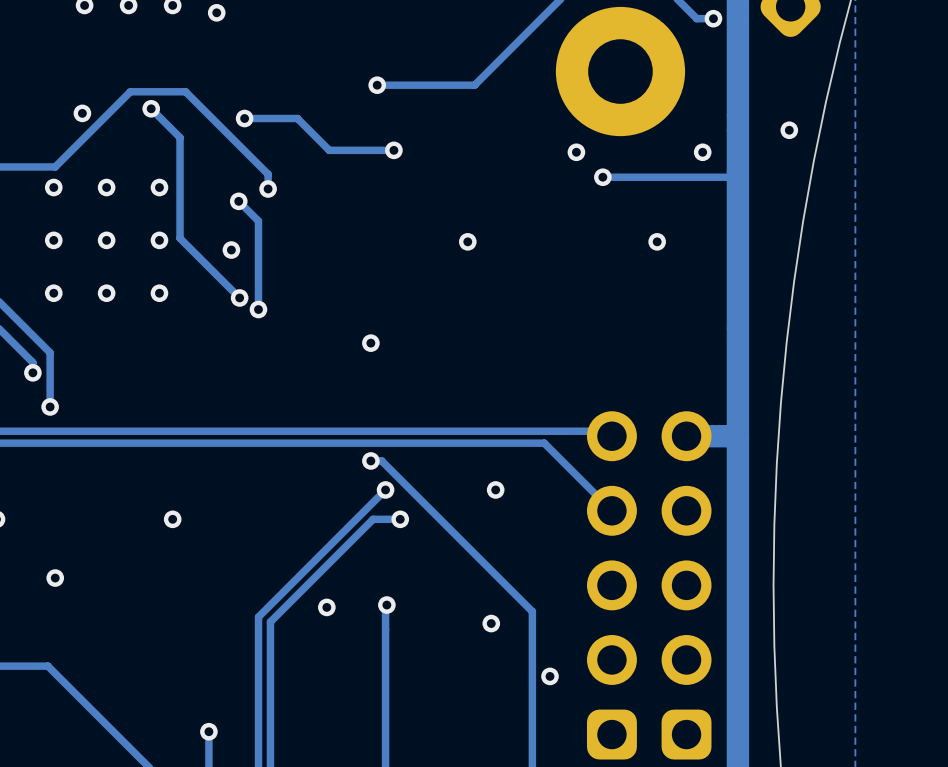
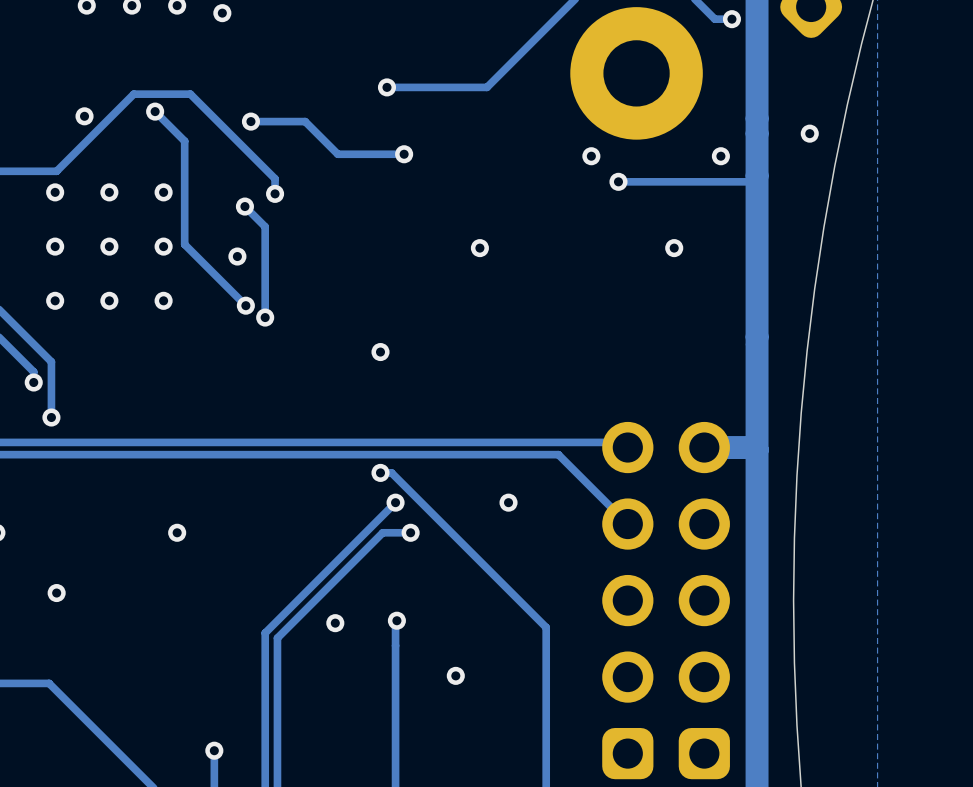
via: (491, 623) -> none
via: none -> (455, 675)
via: (550, 676) -> none

